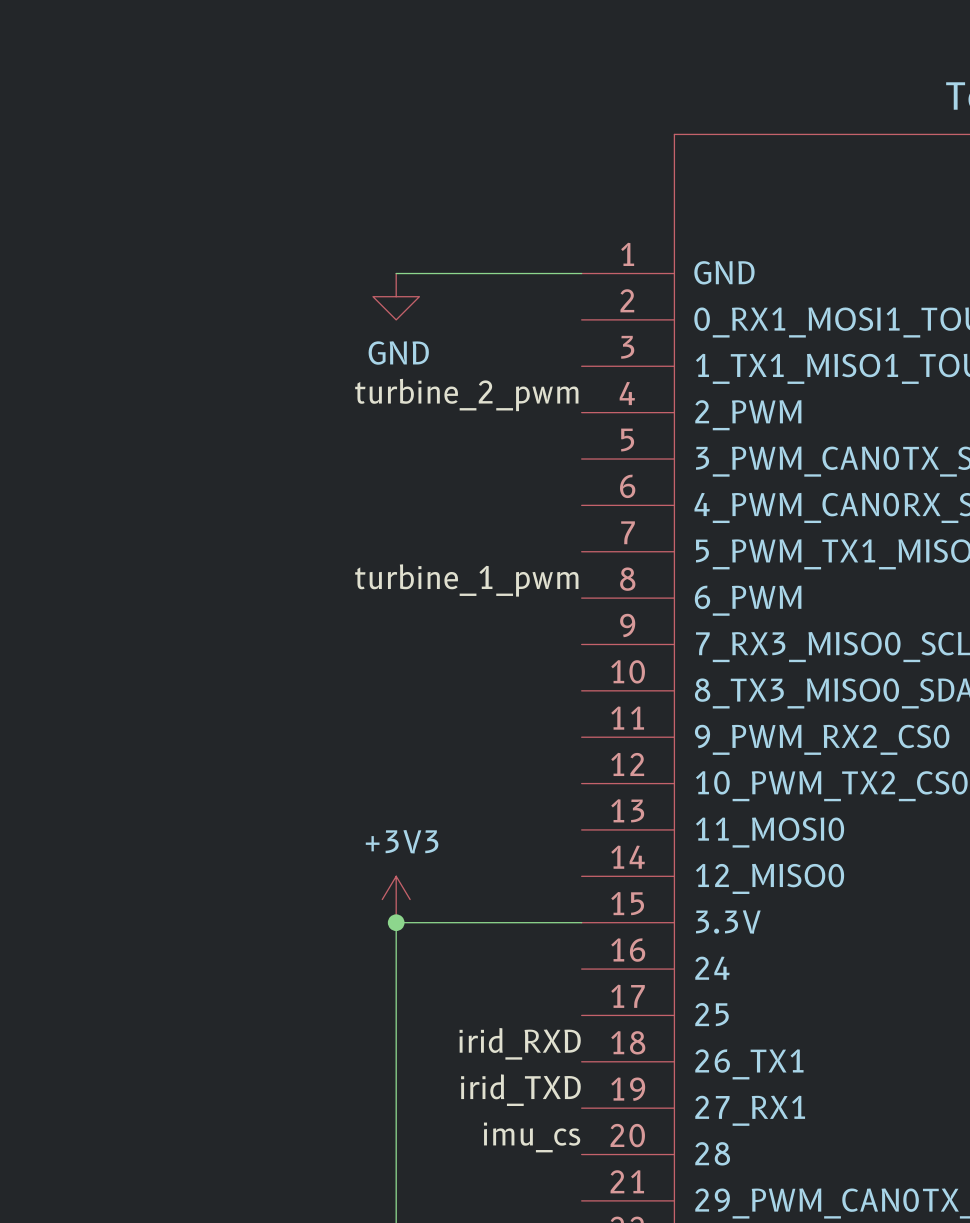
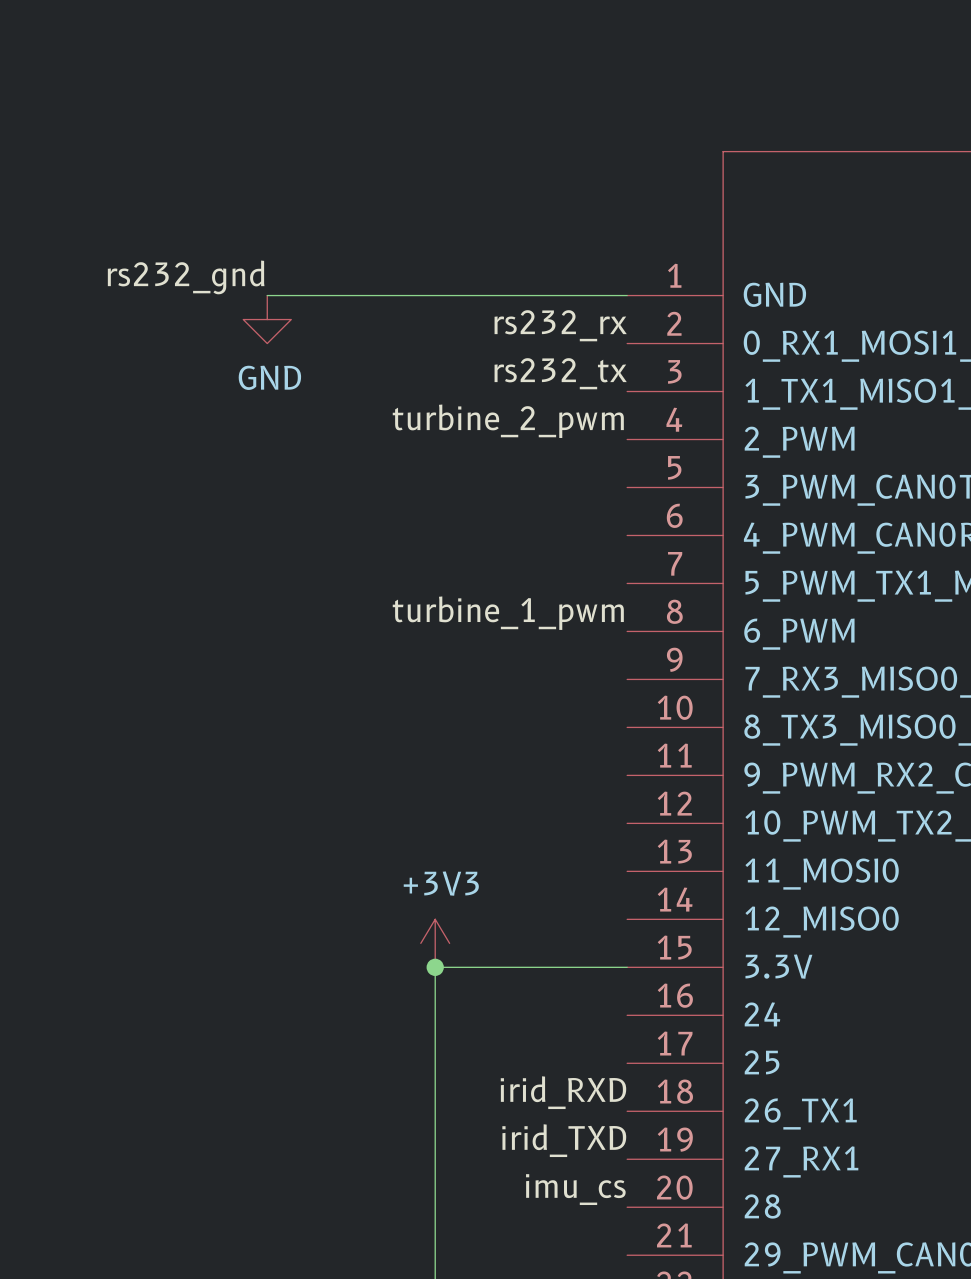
label: none -> rs232_gnd (186, 277)
wire: none -> (267, 295) (435, 295)
power symbol position: GND (396, 296) -> GND (267, 319)
label: none -> rs232_rx (560, 325)
label: none -> rs232_tx (560, 373)

